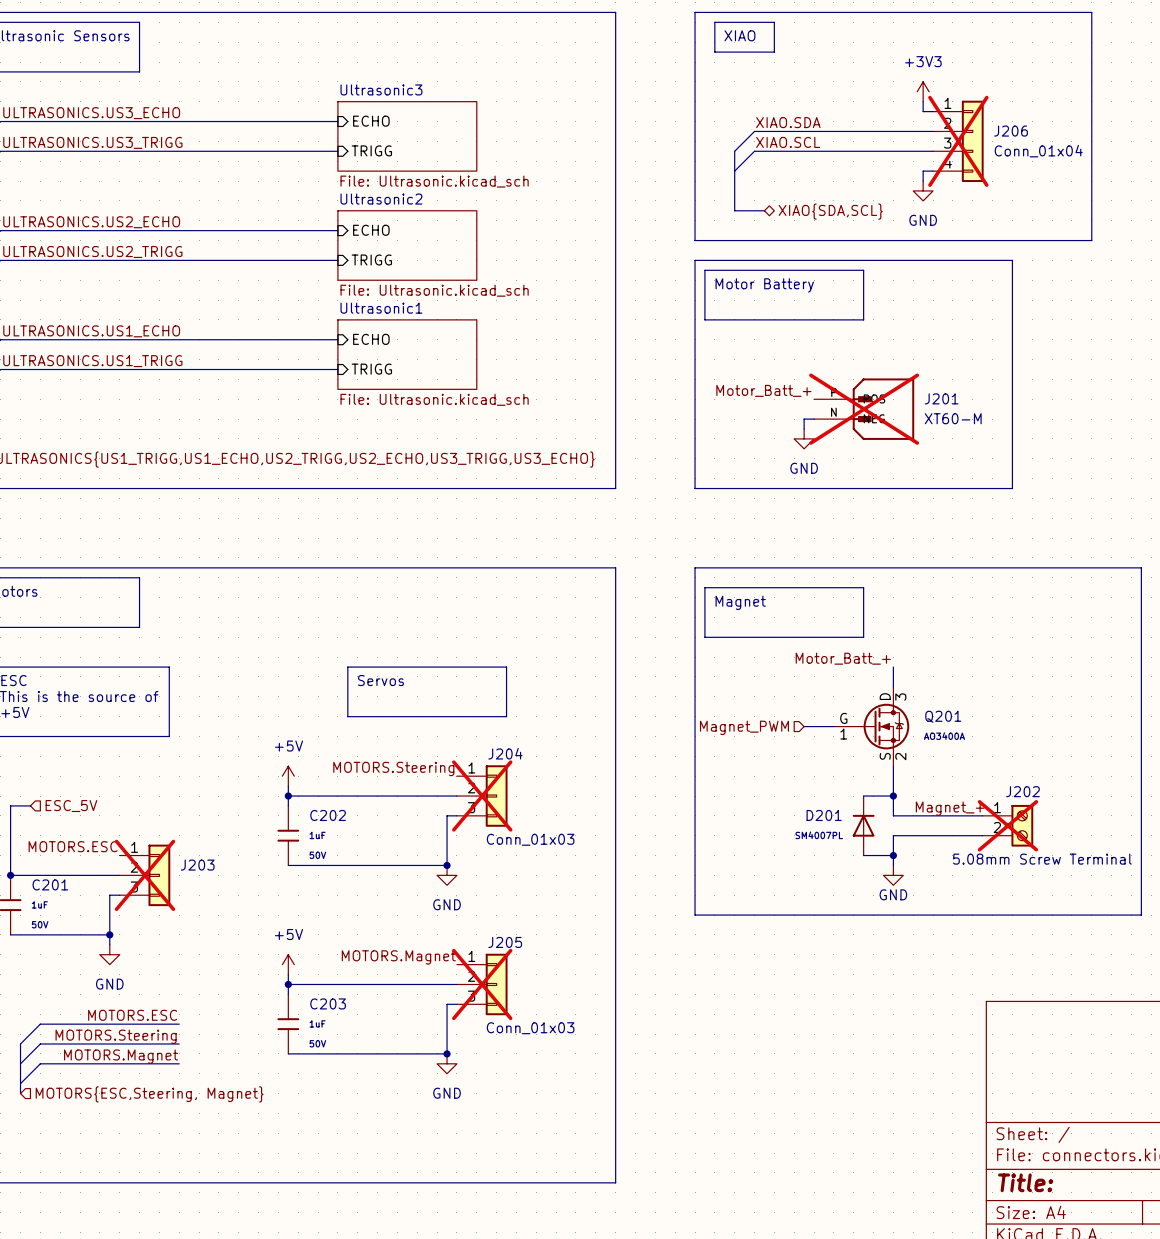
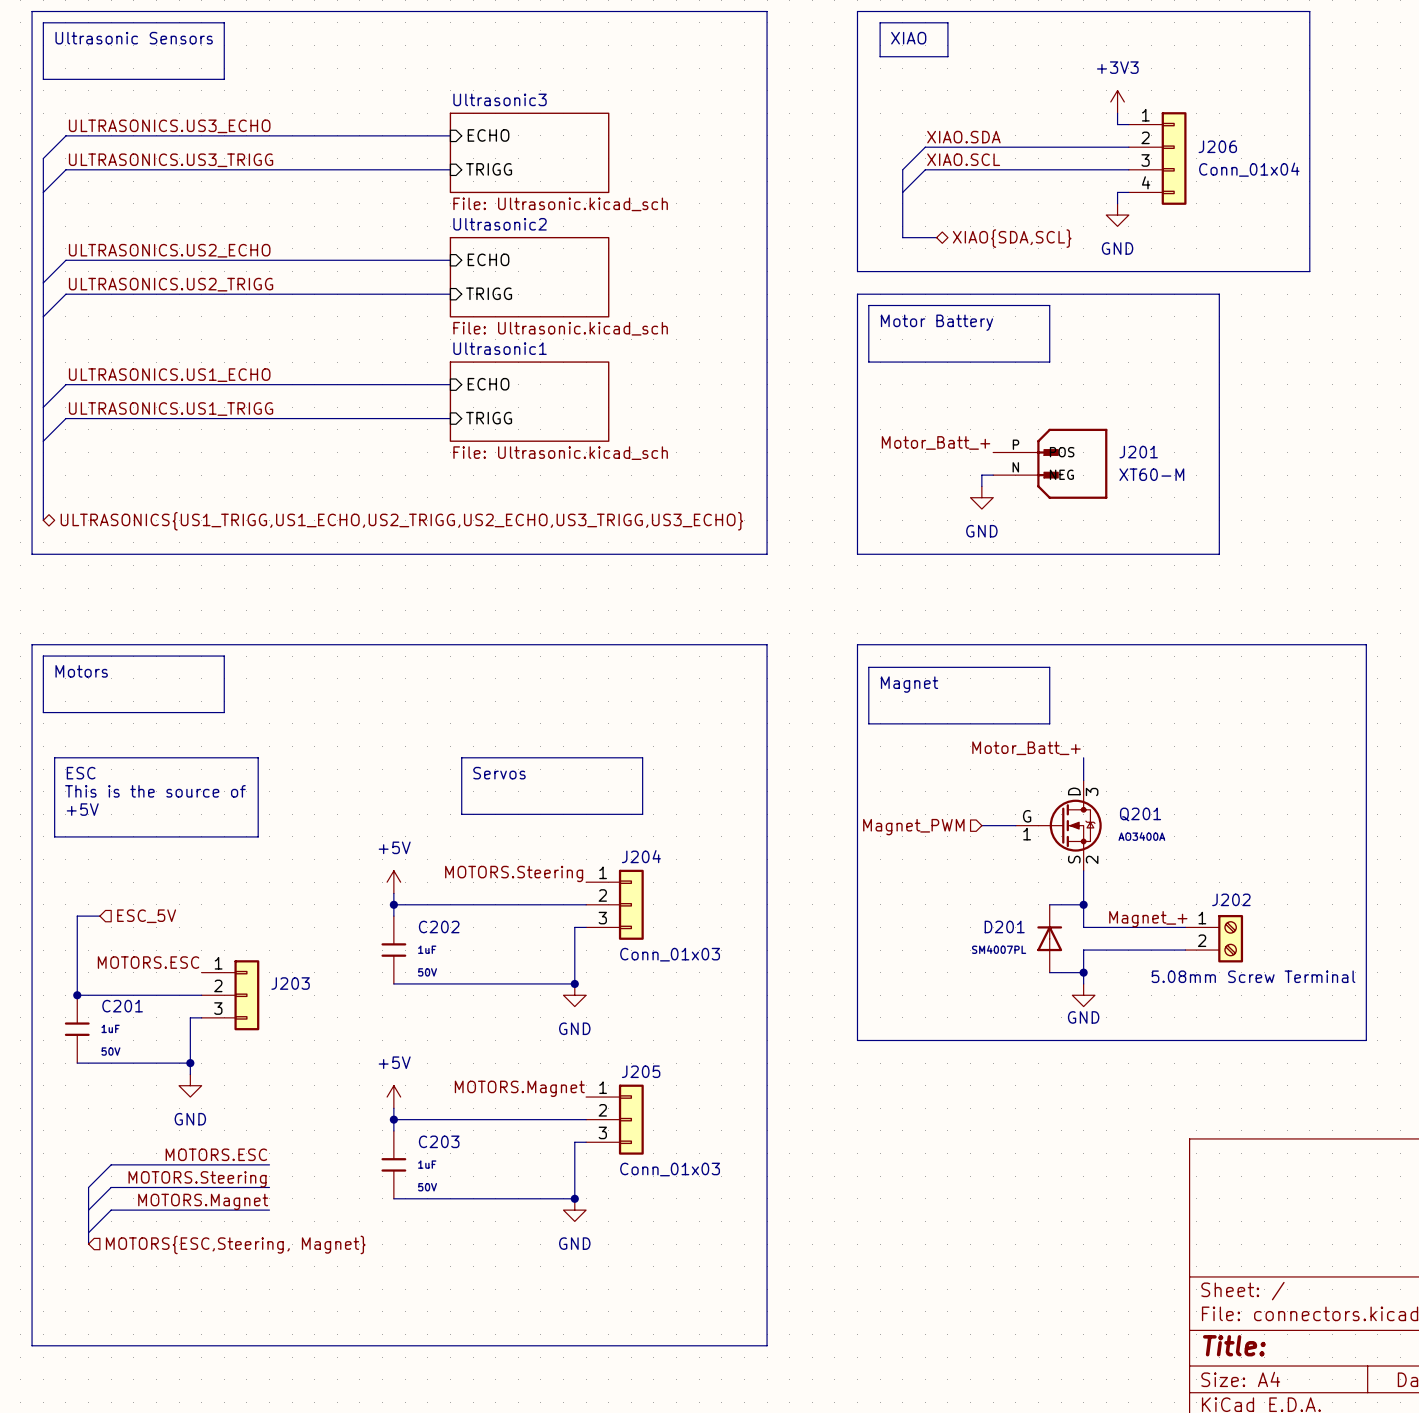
J206 do-not-place cross: (958, 141) -> none
J201 do-not-place cross: (864, 409) -> none
J204 do-not-place cross: (482, 796) -> none
J202 do-not-place cross: (1007, 825) -> none
J203 do-not-place cross: (145, 875) -> none
J205 do-not-place cross: (482, 984) -> none

